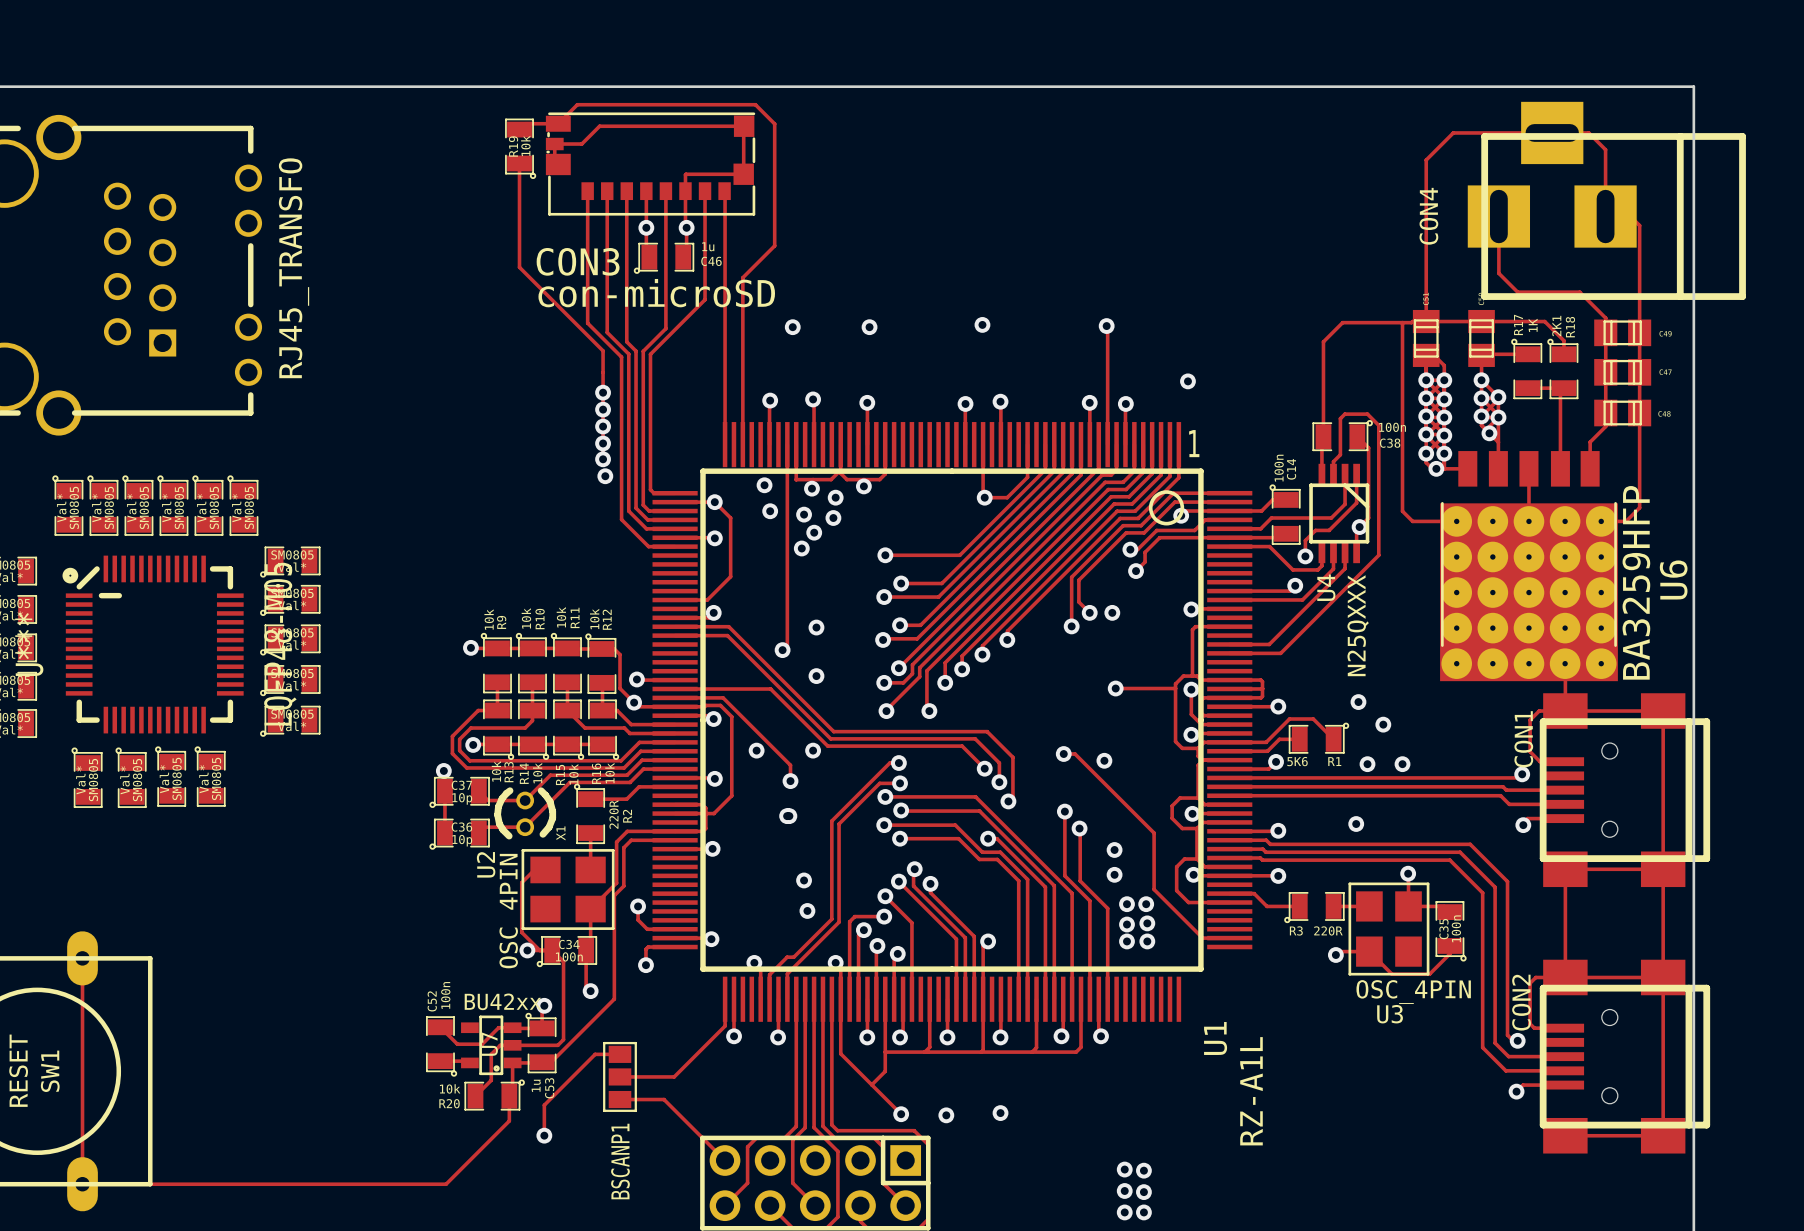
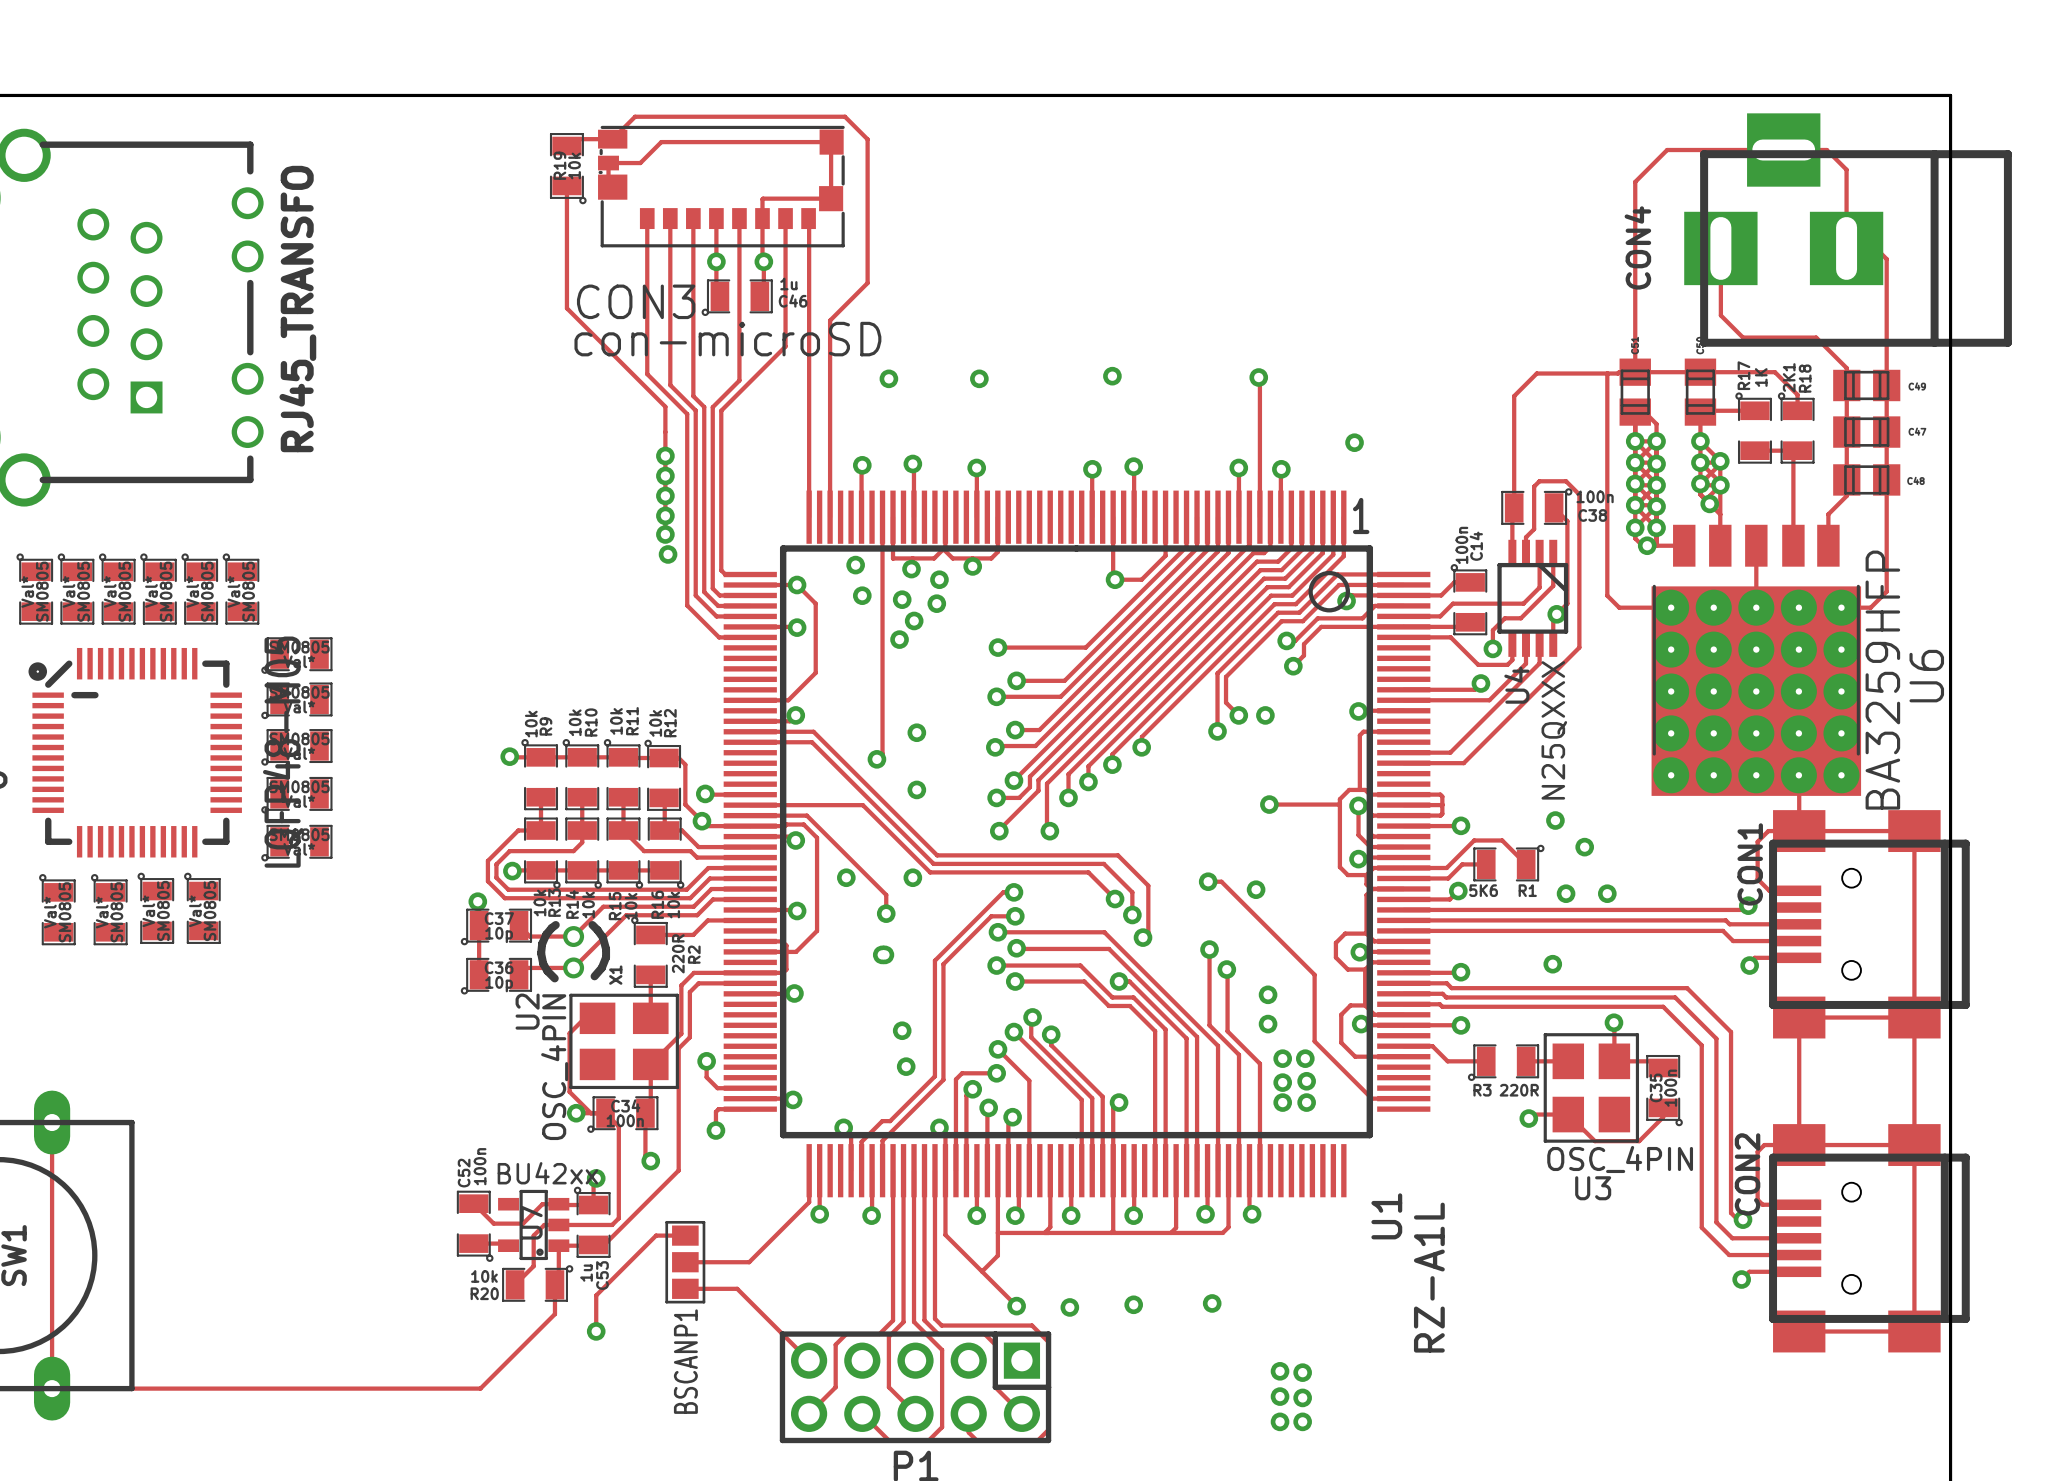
via: none -> (1212, 1303)

